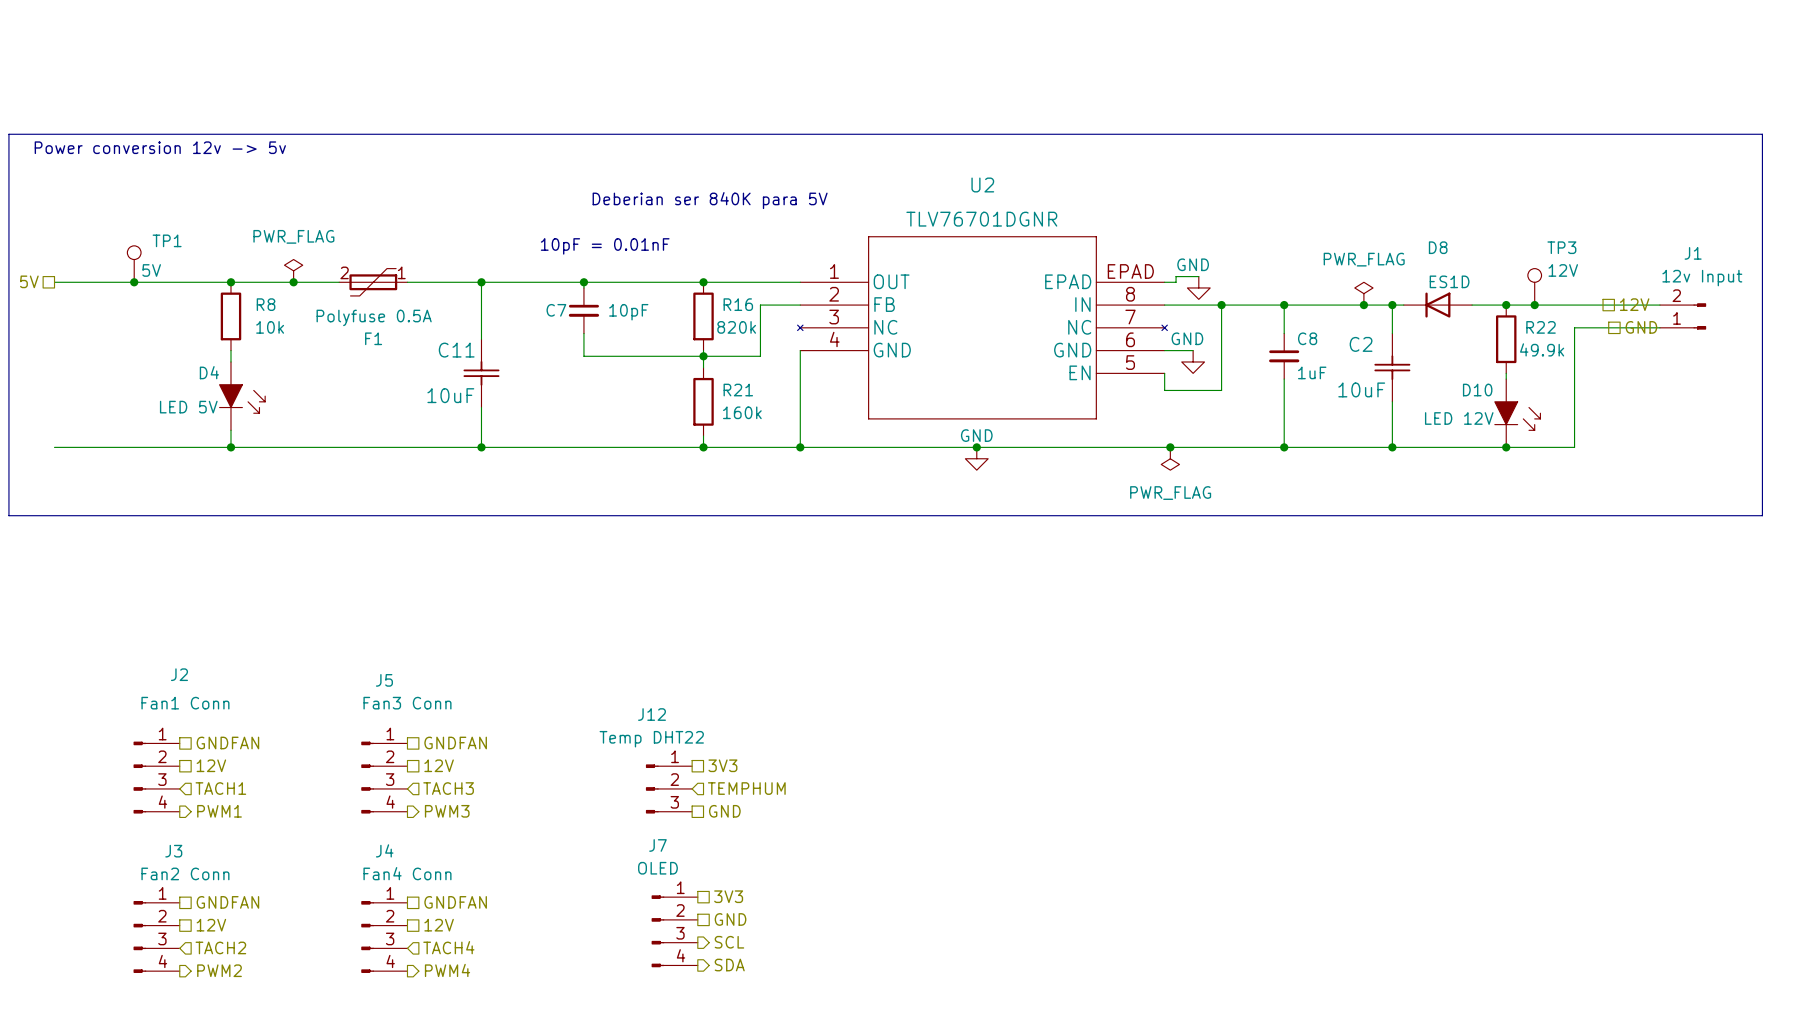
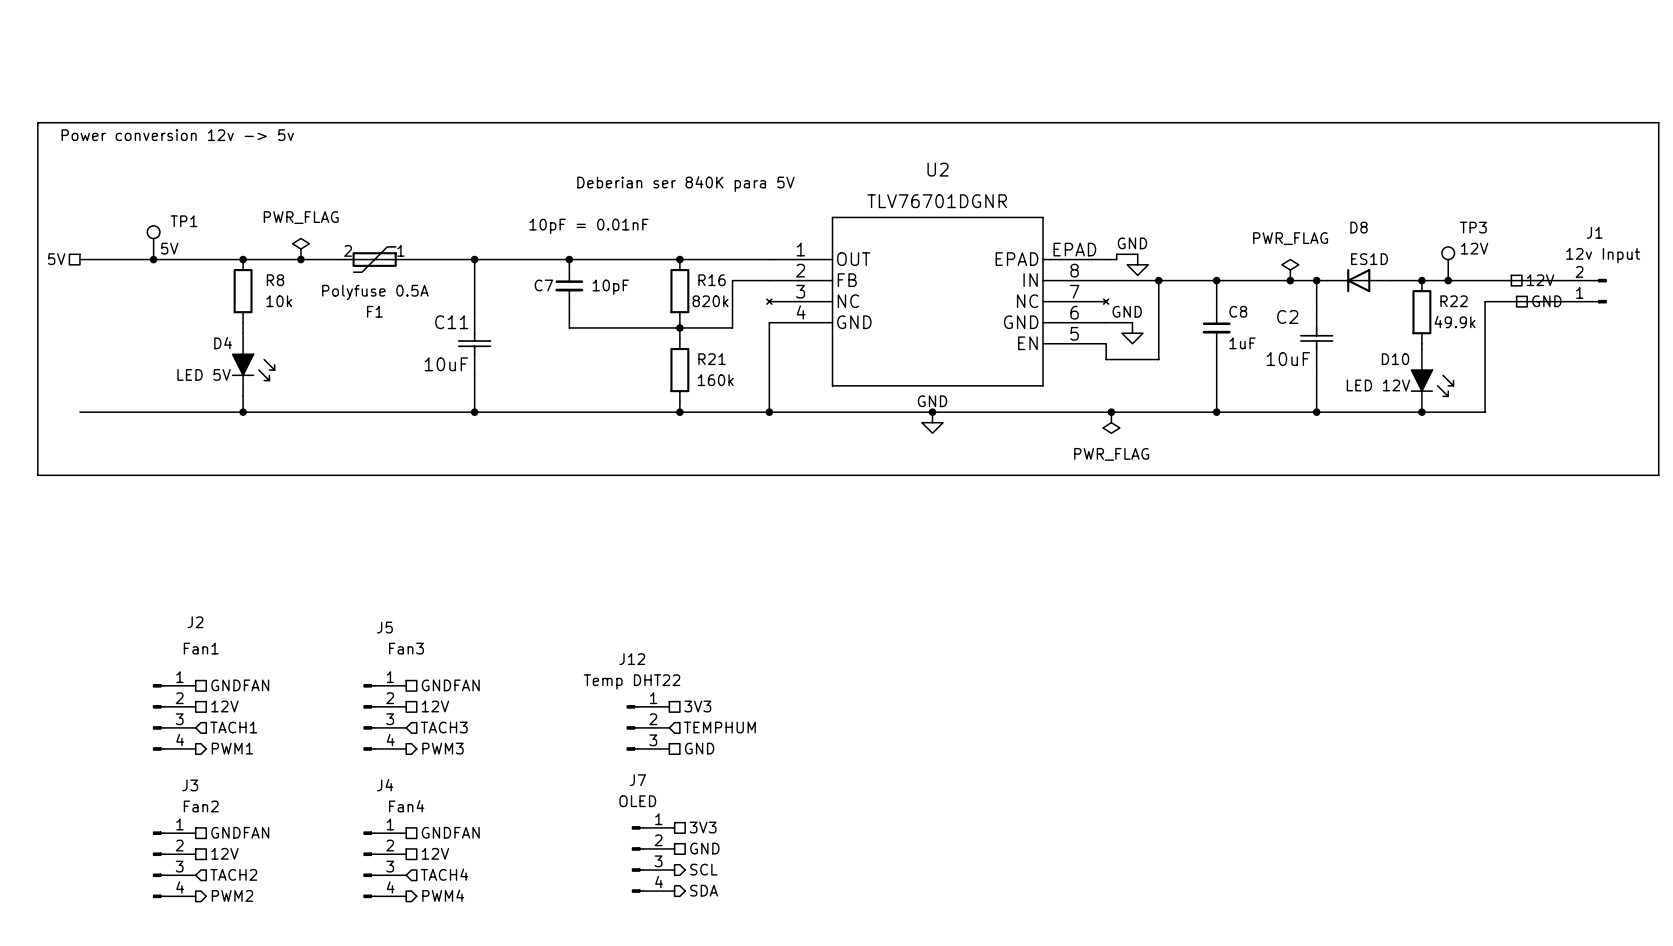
J2 value: Fan1 Conn (185, 703) -> Fan1 (201, 648)
J5 value: Fan3 Conn (407, 703) -> Fan3 (406, 648)
J3 value: Fan2 Conn (185, 873) -> Fan2 (201, 806)
J4 value: Fan4 Conn (407, 873) -> Fan4 (406, 806)

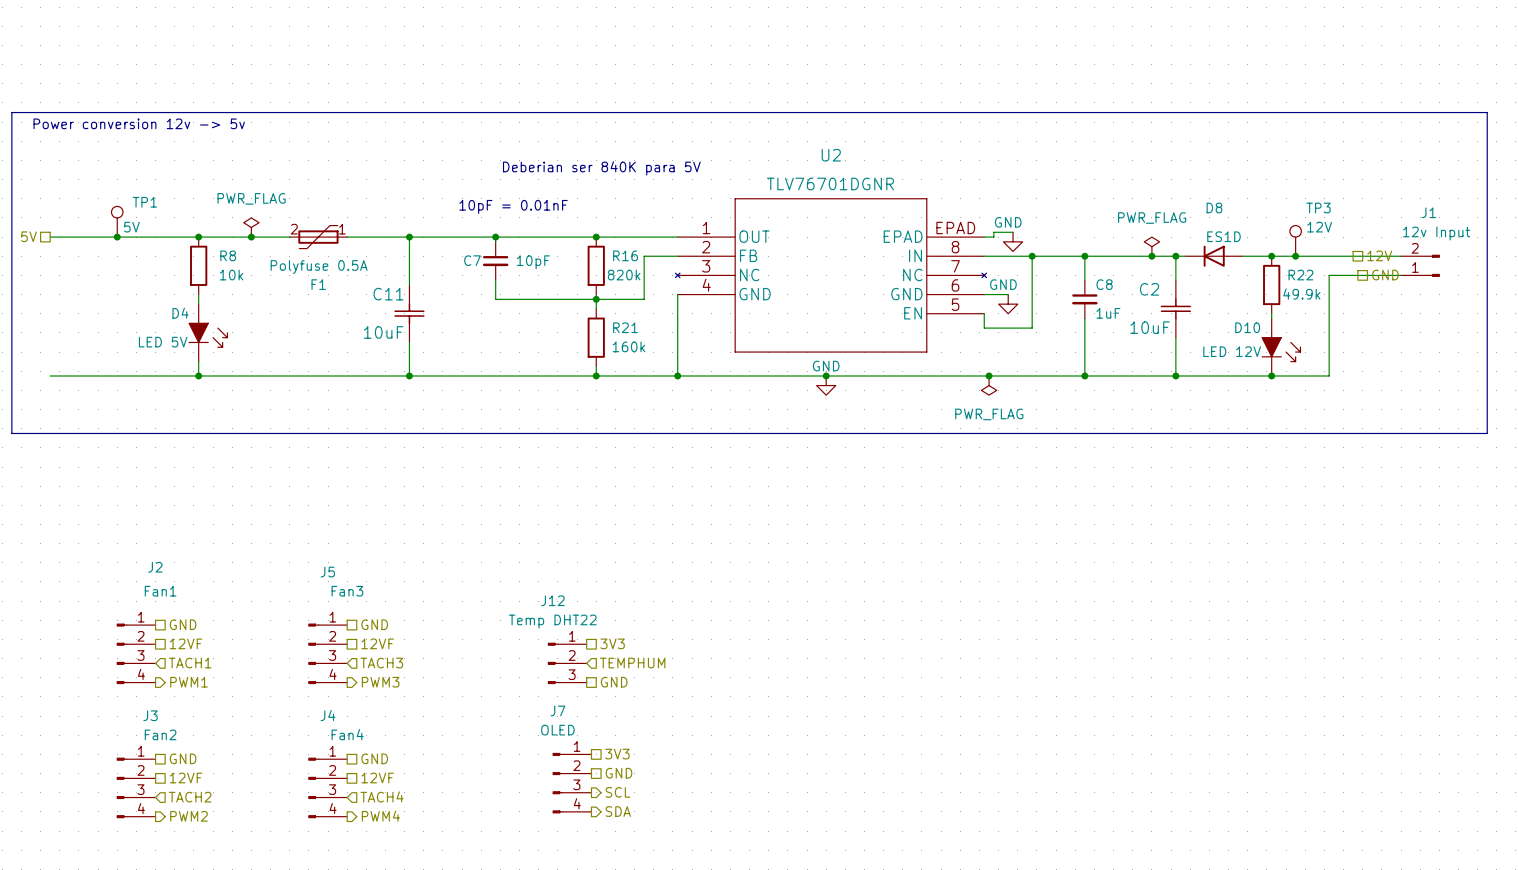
hierarchical label: GNDFAN (240, 685) -> GND (183, 624)
hierarchical label: GNDFAN (450, 685) -> GND (374, 624)
hierarchical label: 12V (224, 706) -> 12VF (186, 643)
hierarchical label: 12V (435, 706) -> 12VF (377, 643)
hierarchical label: GNDFAN (240, 832) -> GND (183, 758)
hierarchical label: GNDFAN (450, 832) -> GND (374, 758)
hierarchical label: 12V (224, 853) -> 12VF (186, 778)
hierarchical label: 12V (435, 853) -> 12VF (377, 778)

